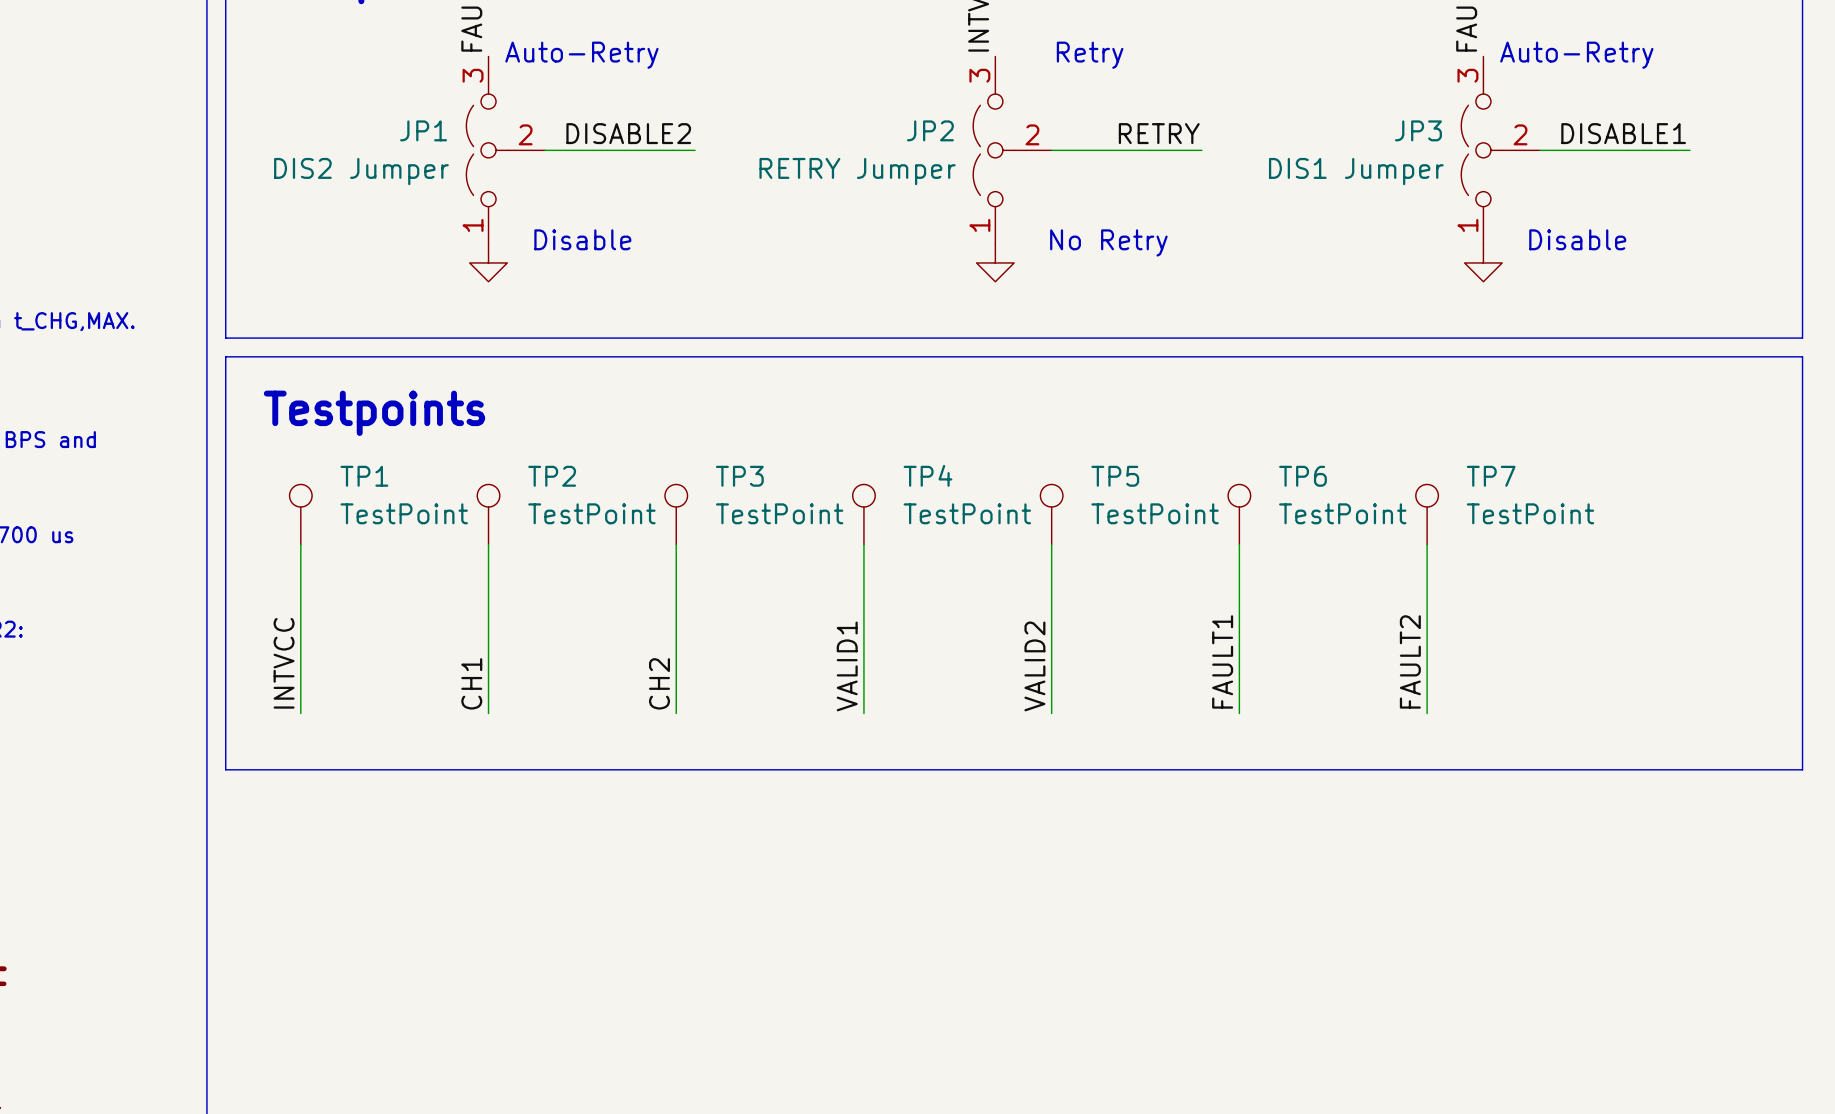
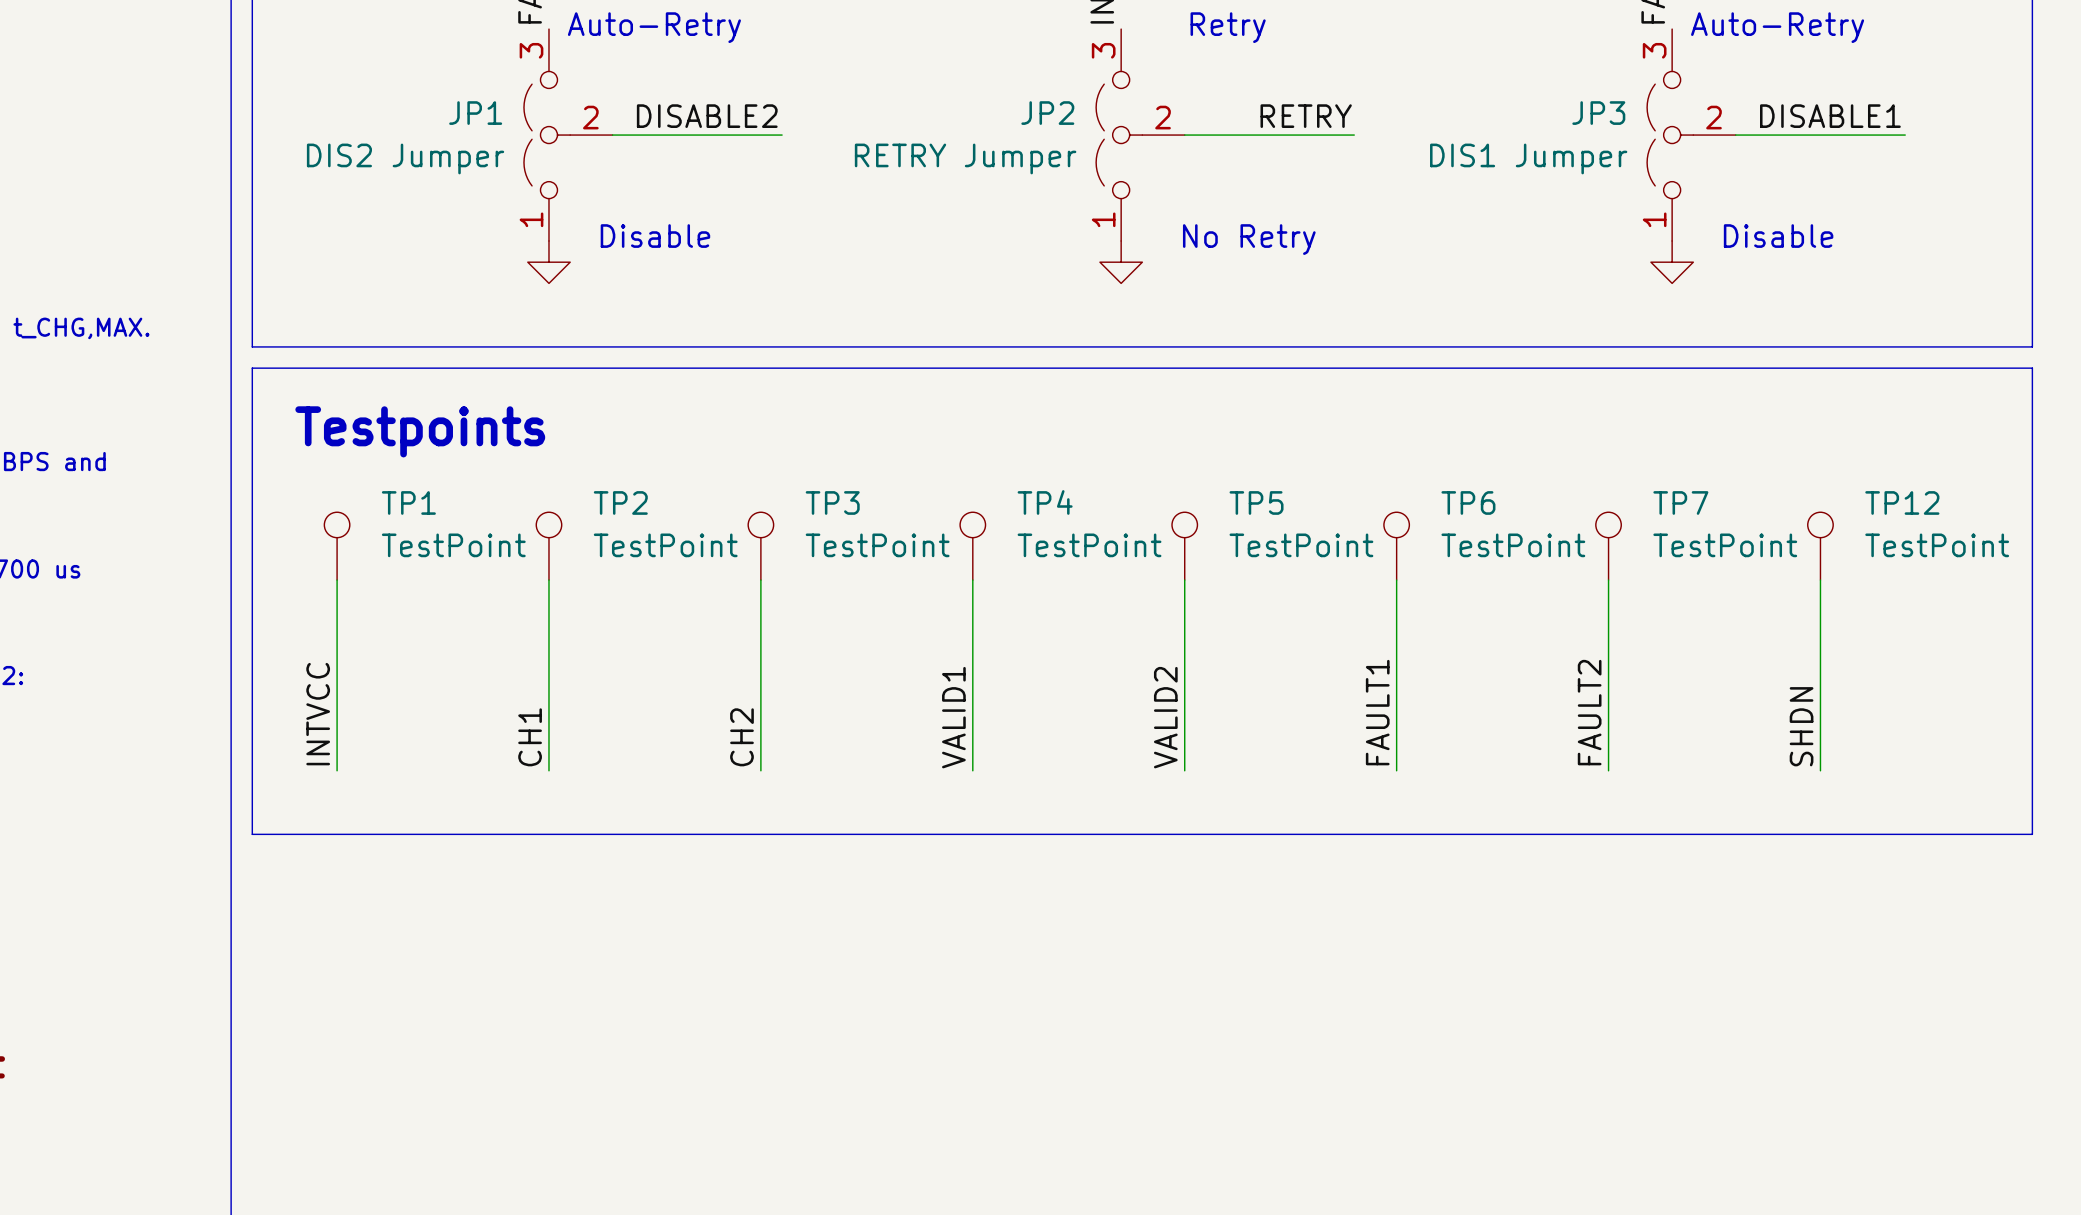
TP12: none -> TestPoint (1820, 546)
wire: none -> (1820, 580) (1820, 770)
label: none -> SHDN (1801, 726)

